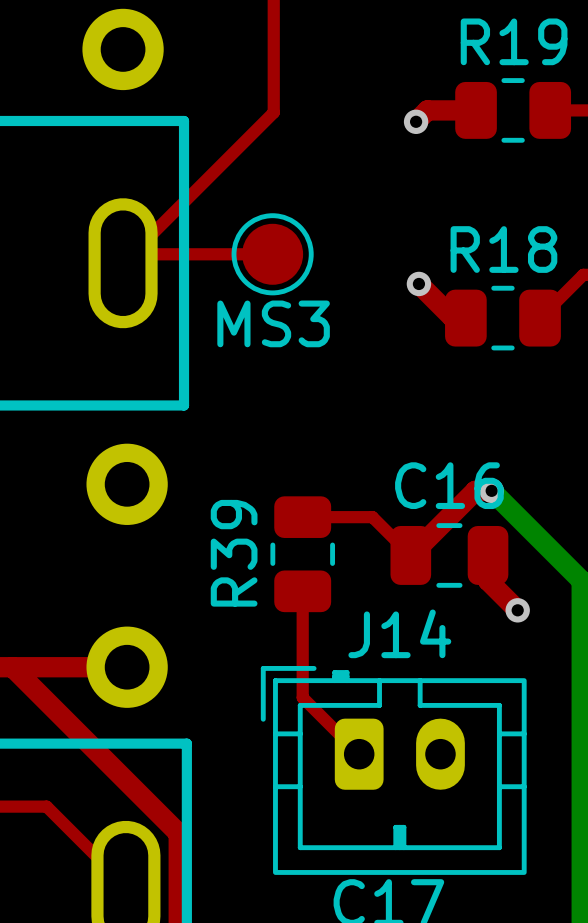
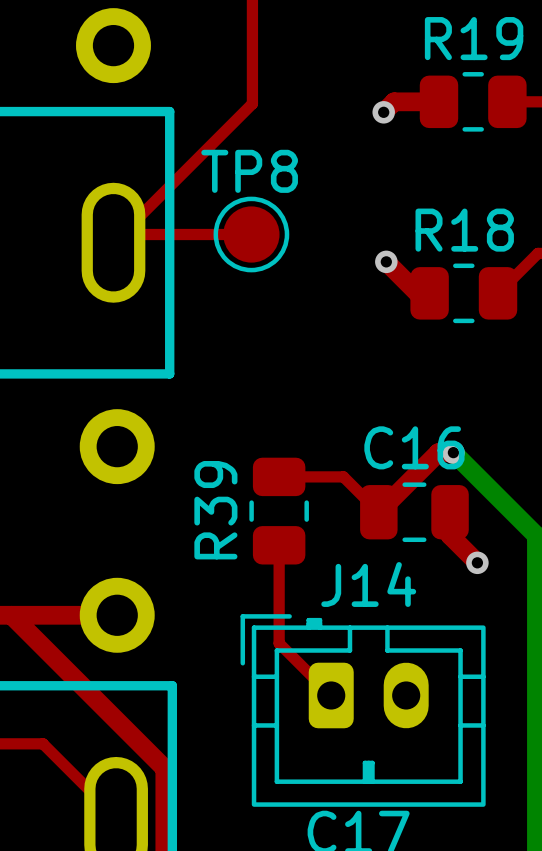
TP8 name: none -> TP8 (249, 171)
TP8 value: MS3 (273, 323) -> none

